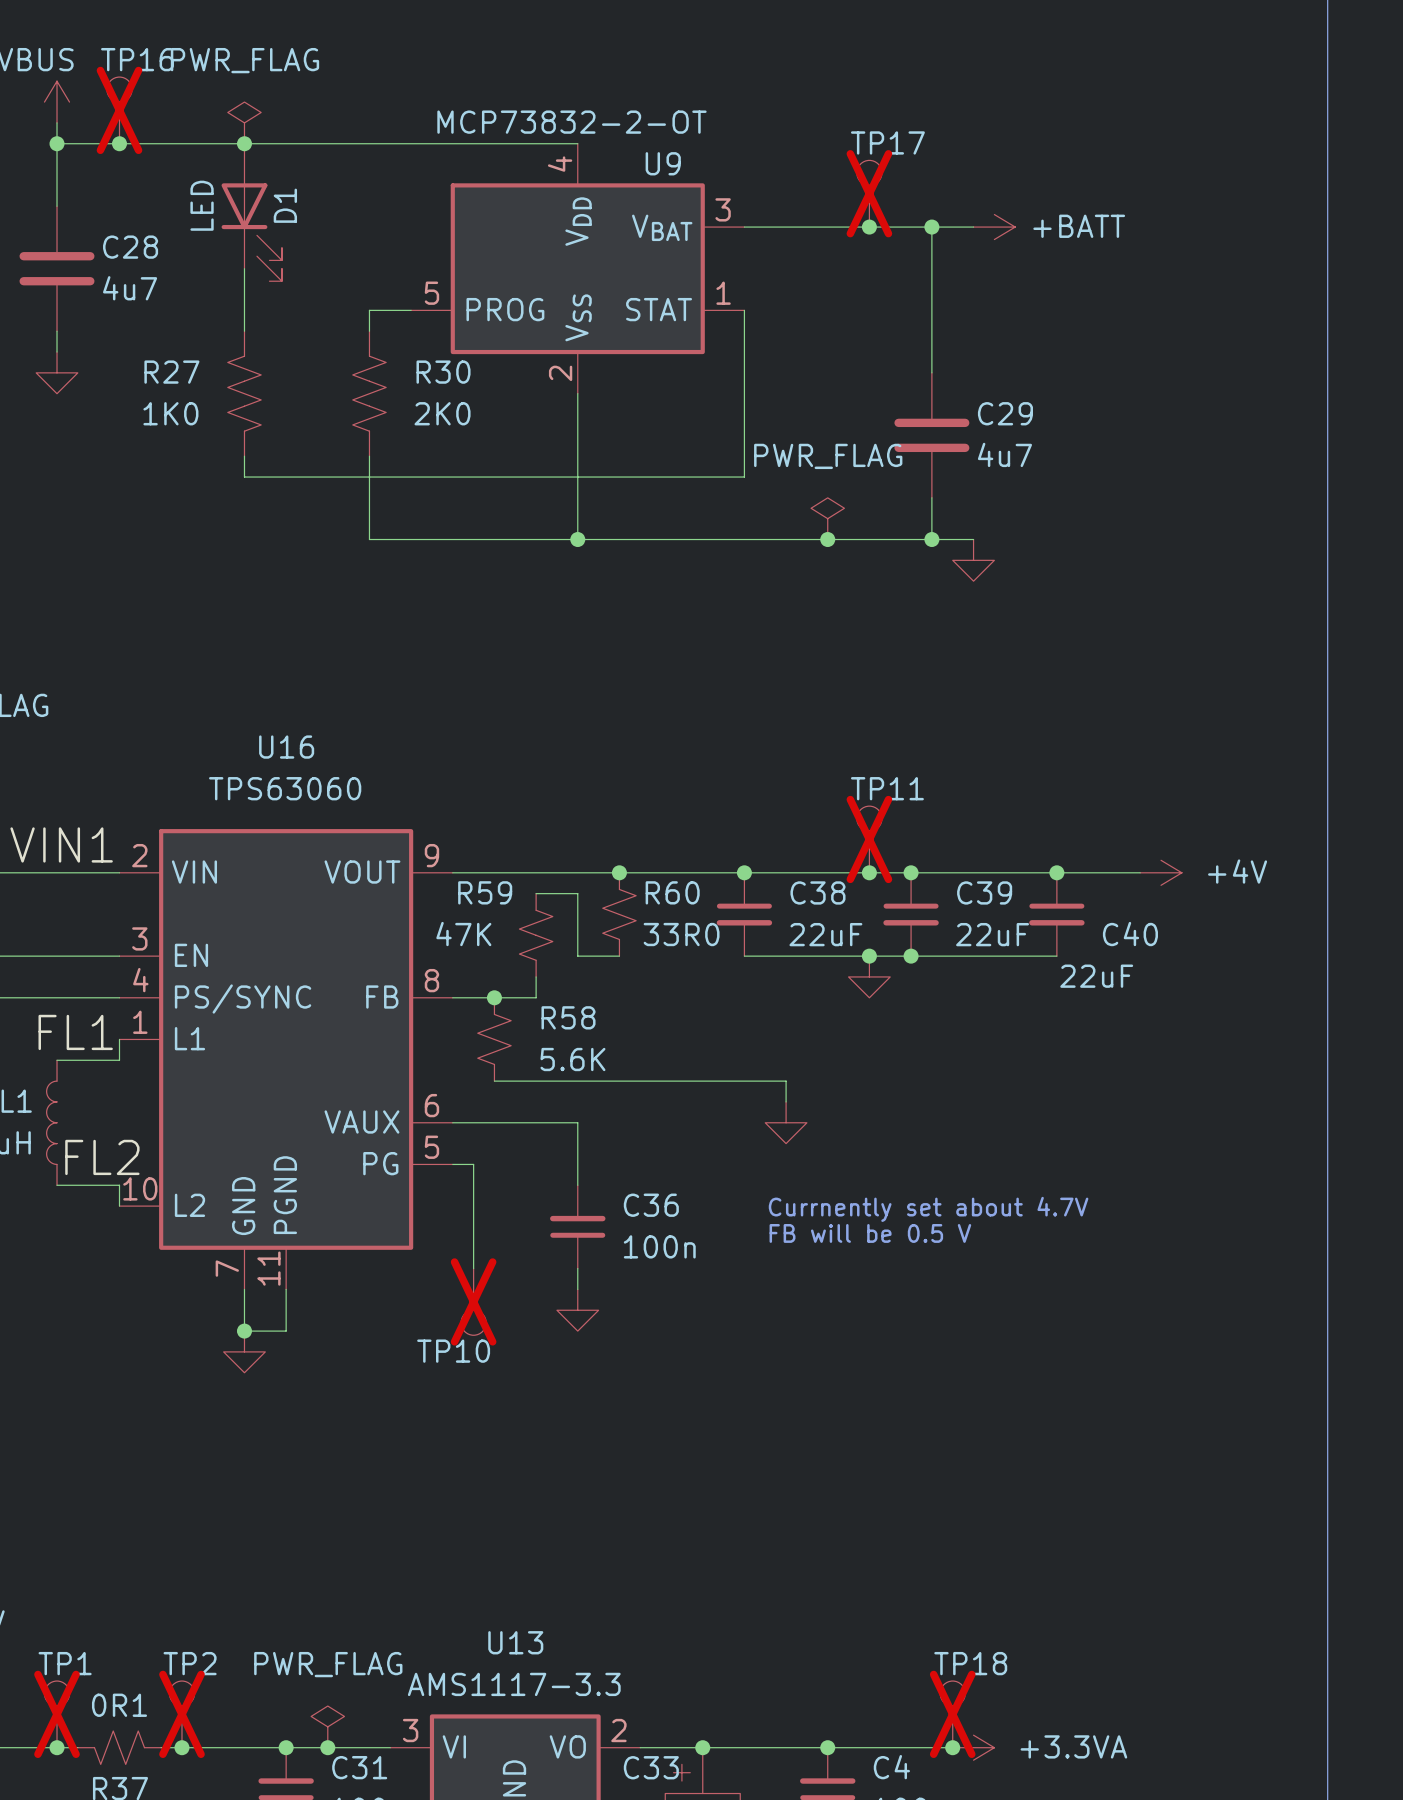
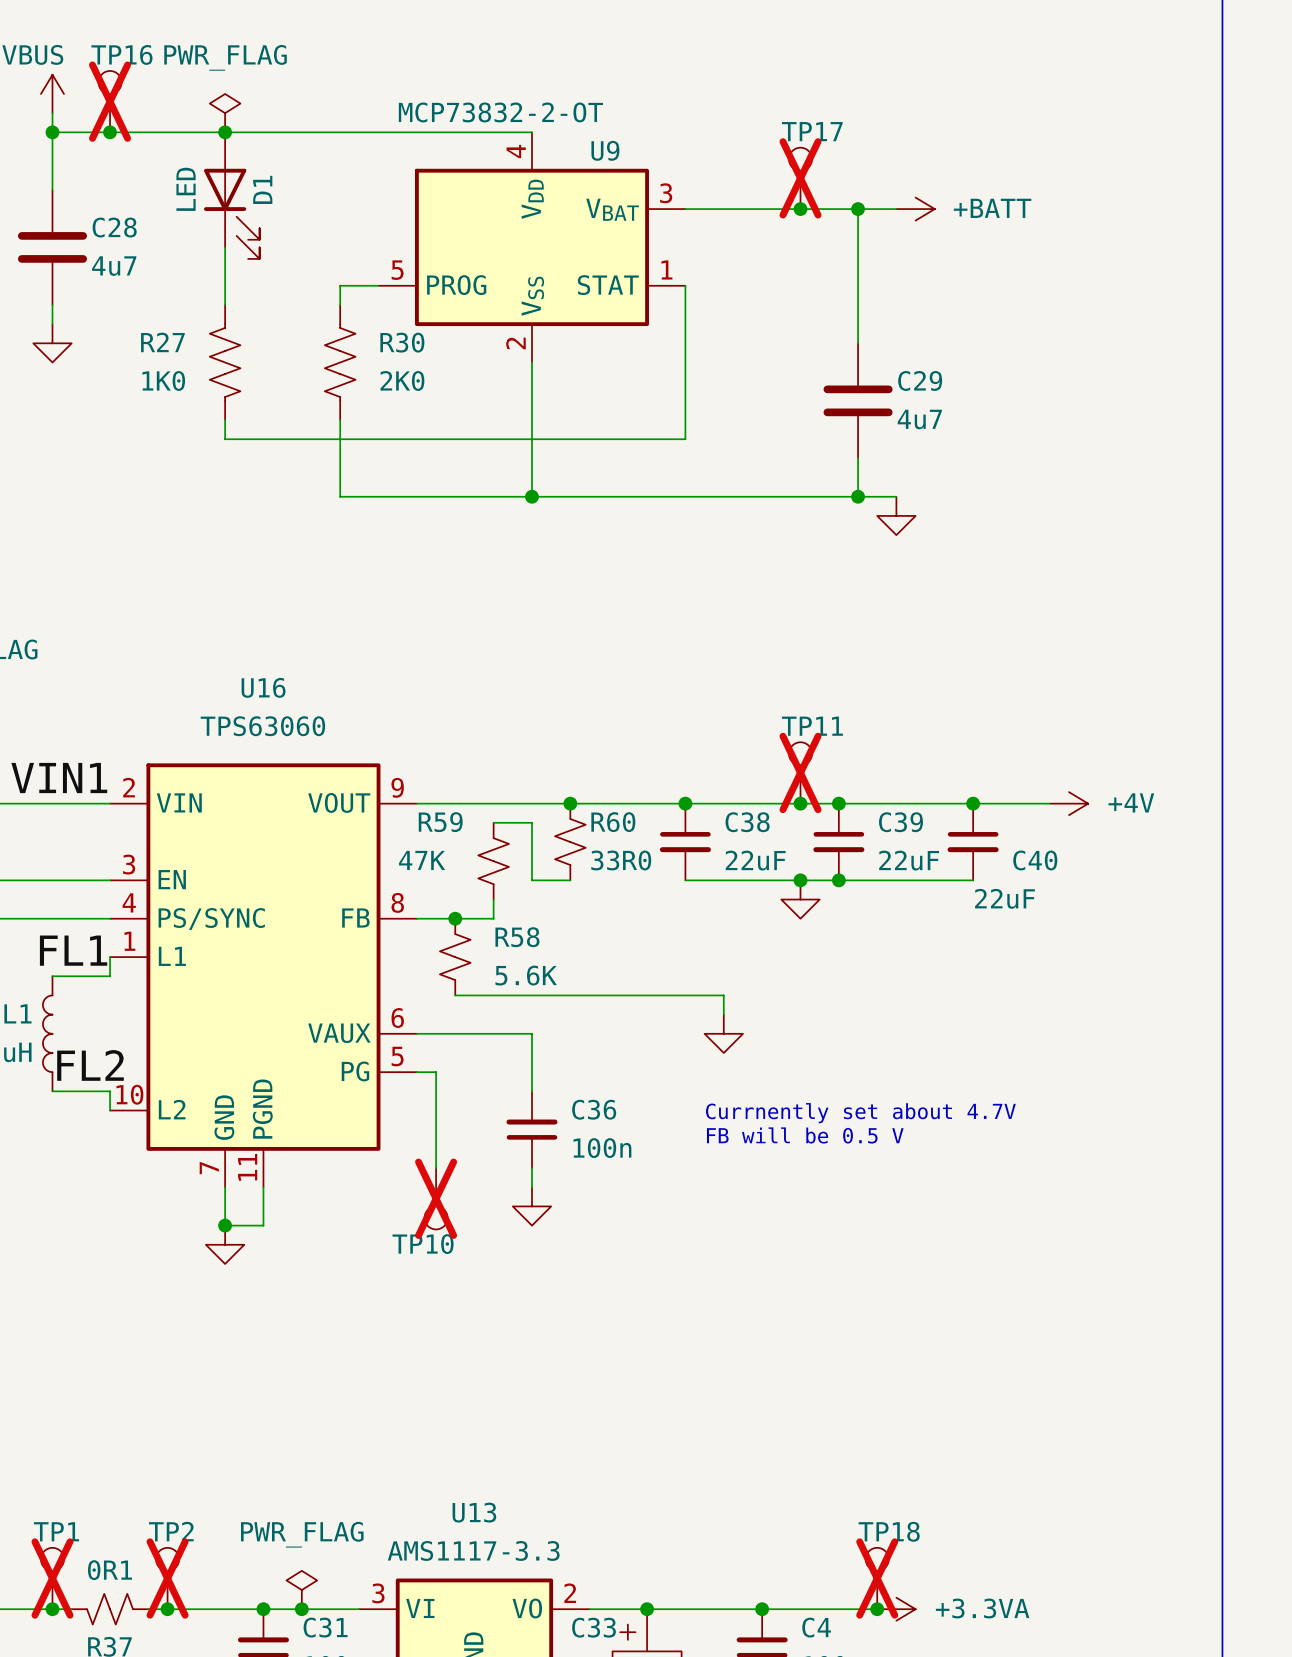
power symbol: PWR_FLAG (827, 518) -> none
junction: (827, 539) -> none

